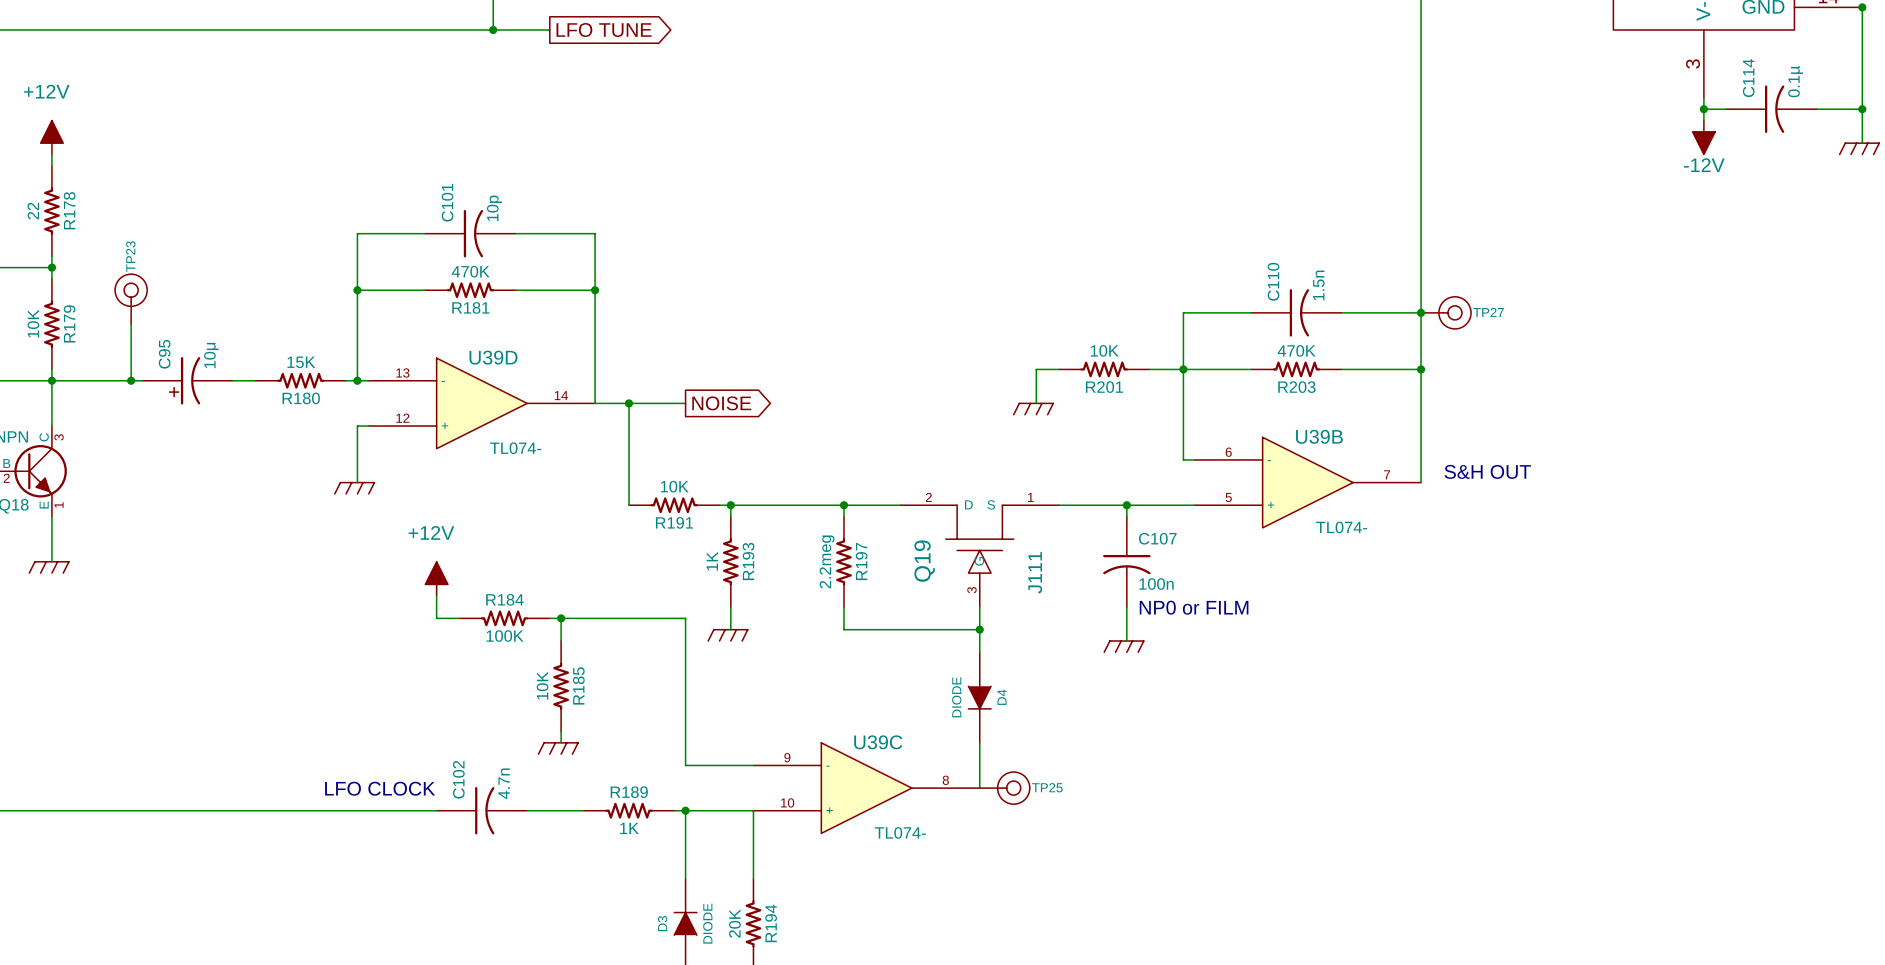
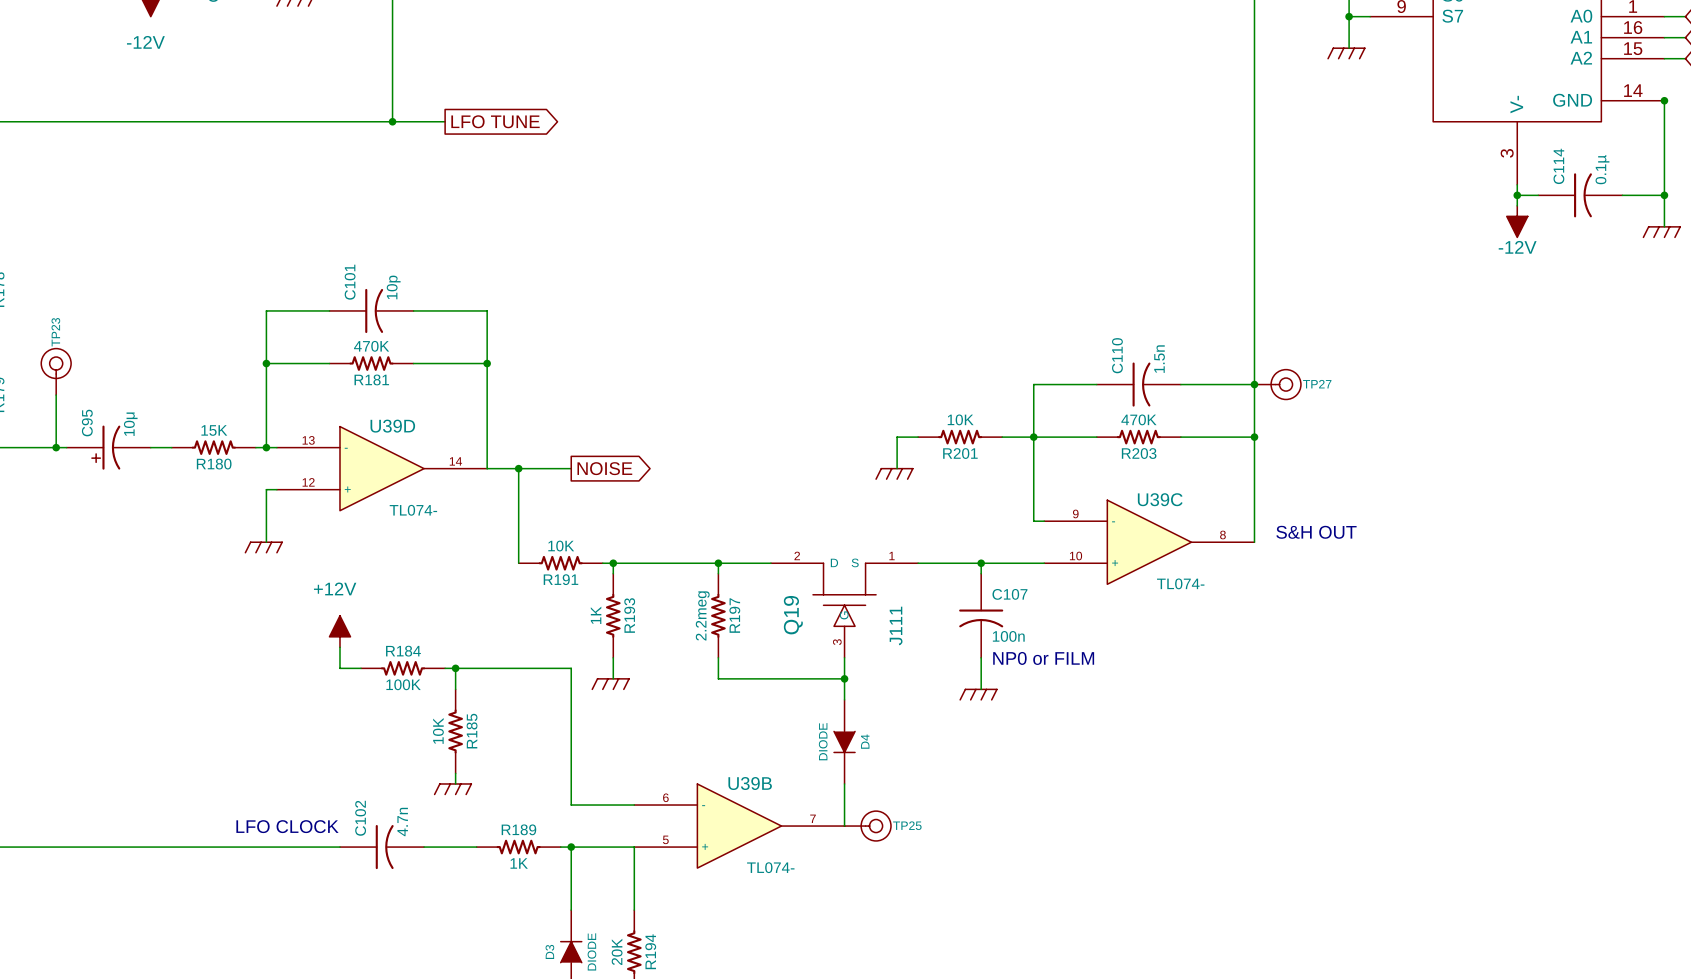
U39B position: (1307, 482) -> (739, 826)
U39C position: (866, 788) -> (1149, 542)

